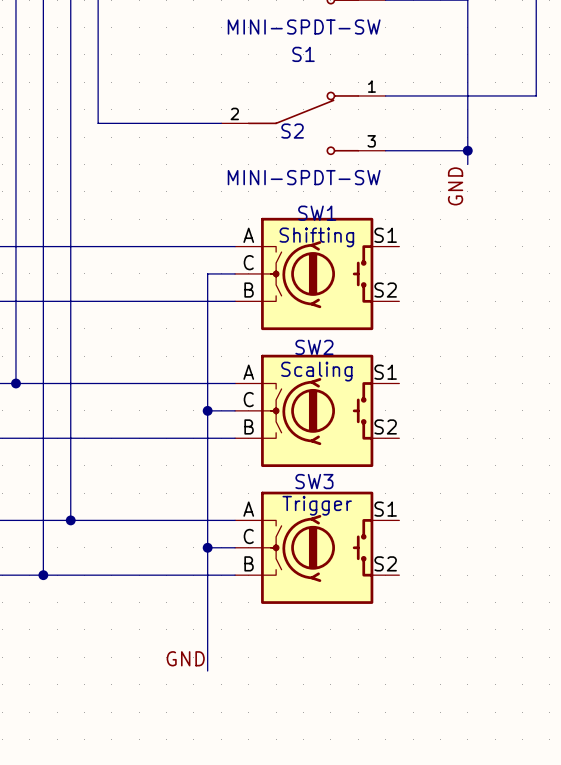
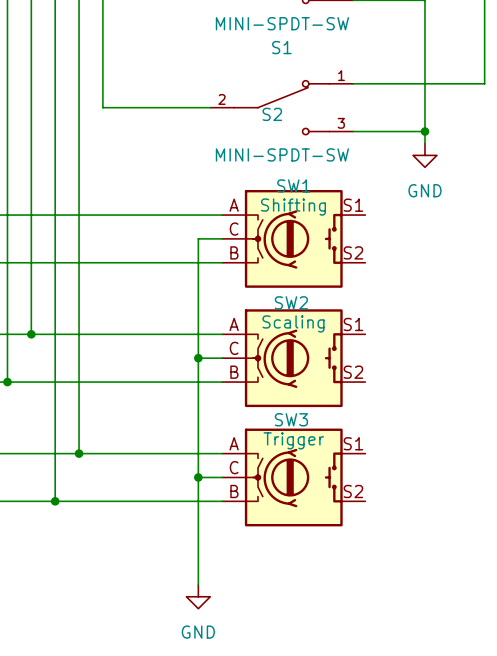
power symbol: none -> GND (424, 155)
label: GND (455, 186) -> none
label: GND (185, 658) -> none
power symbol: none -> GND (198, 596)

